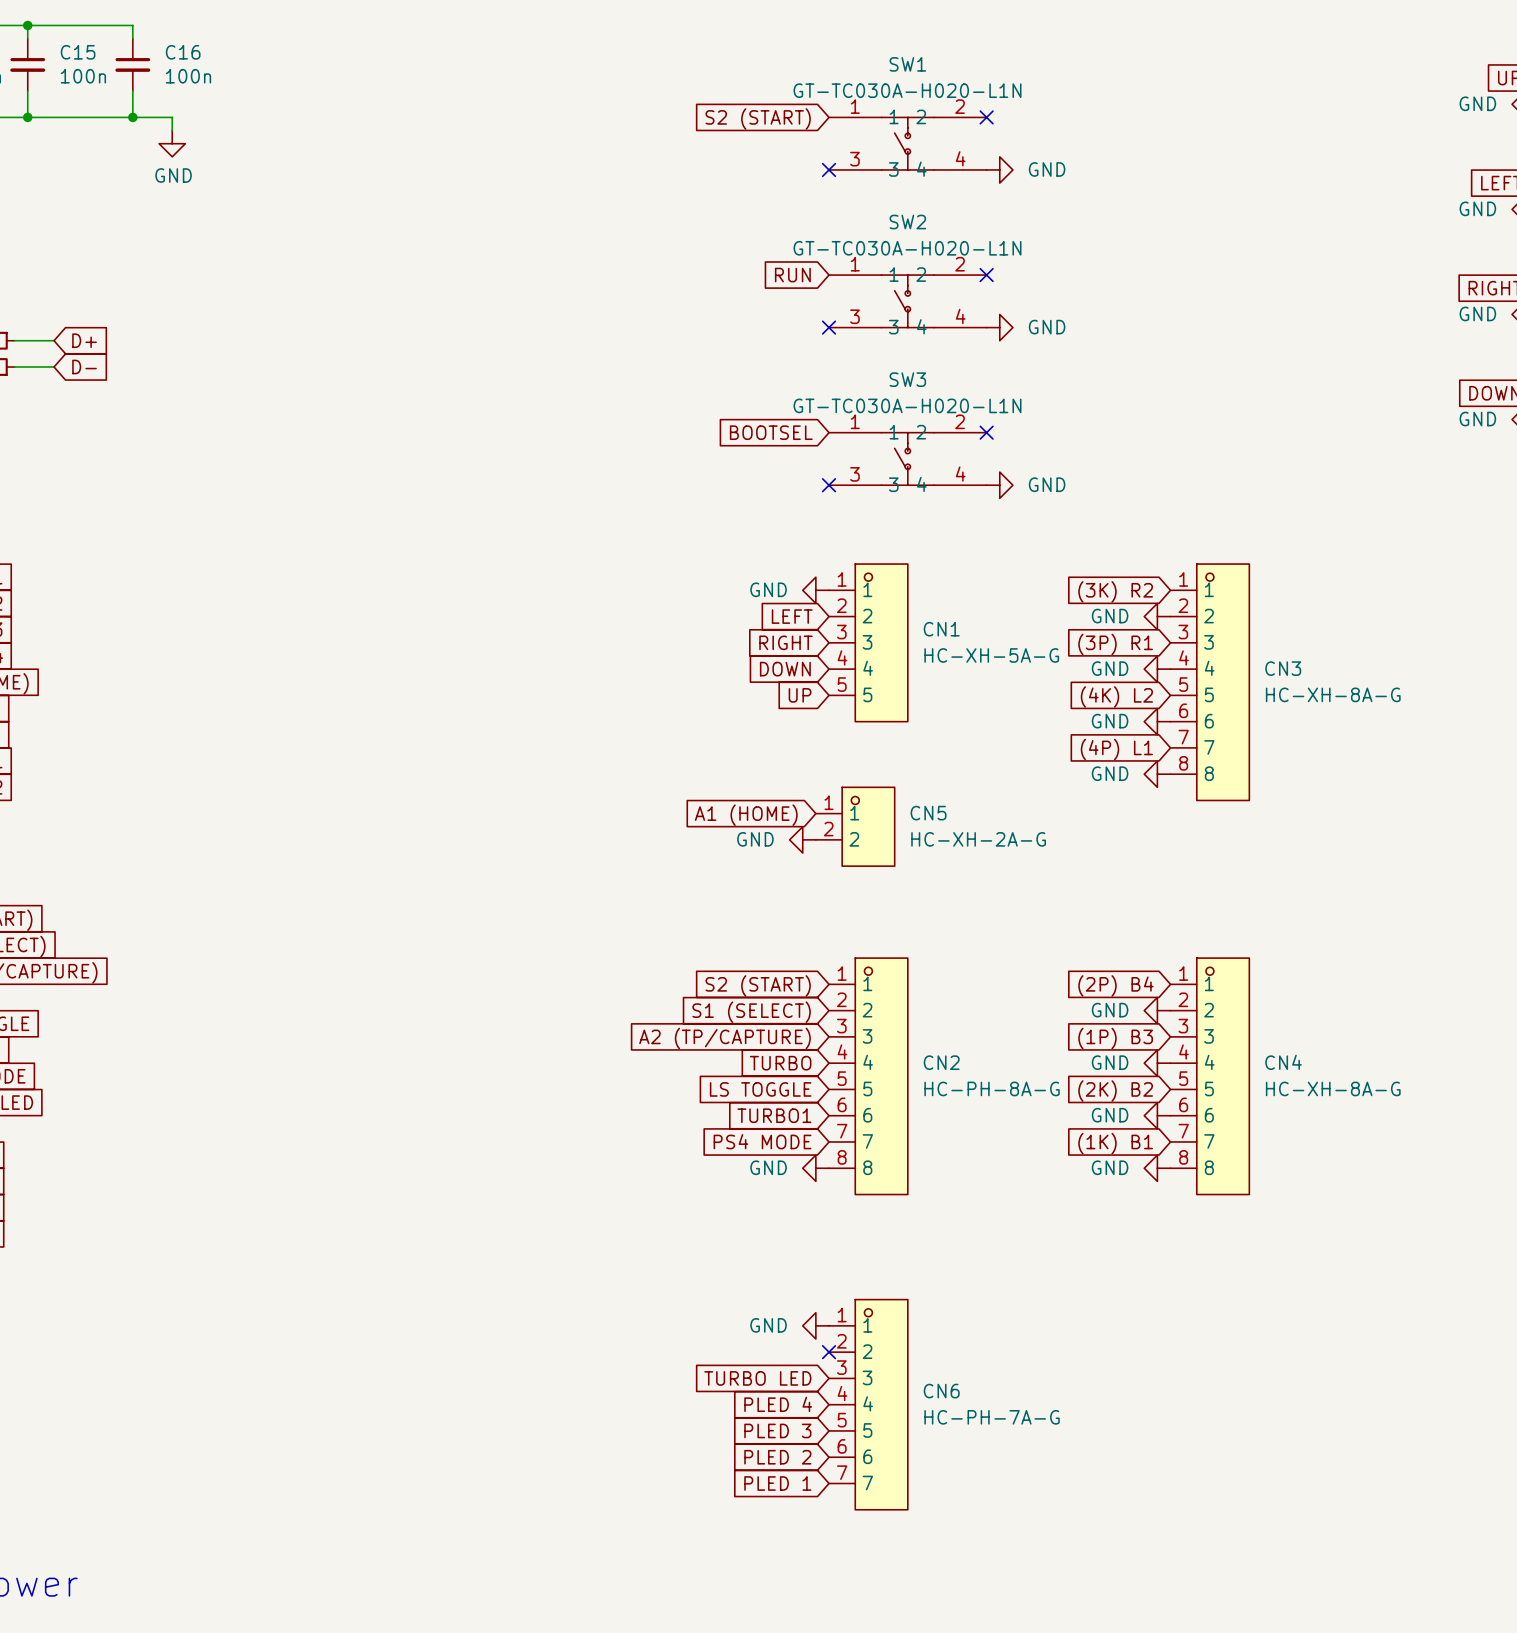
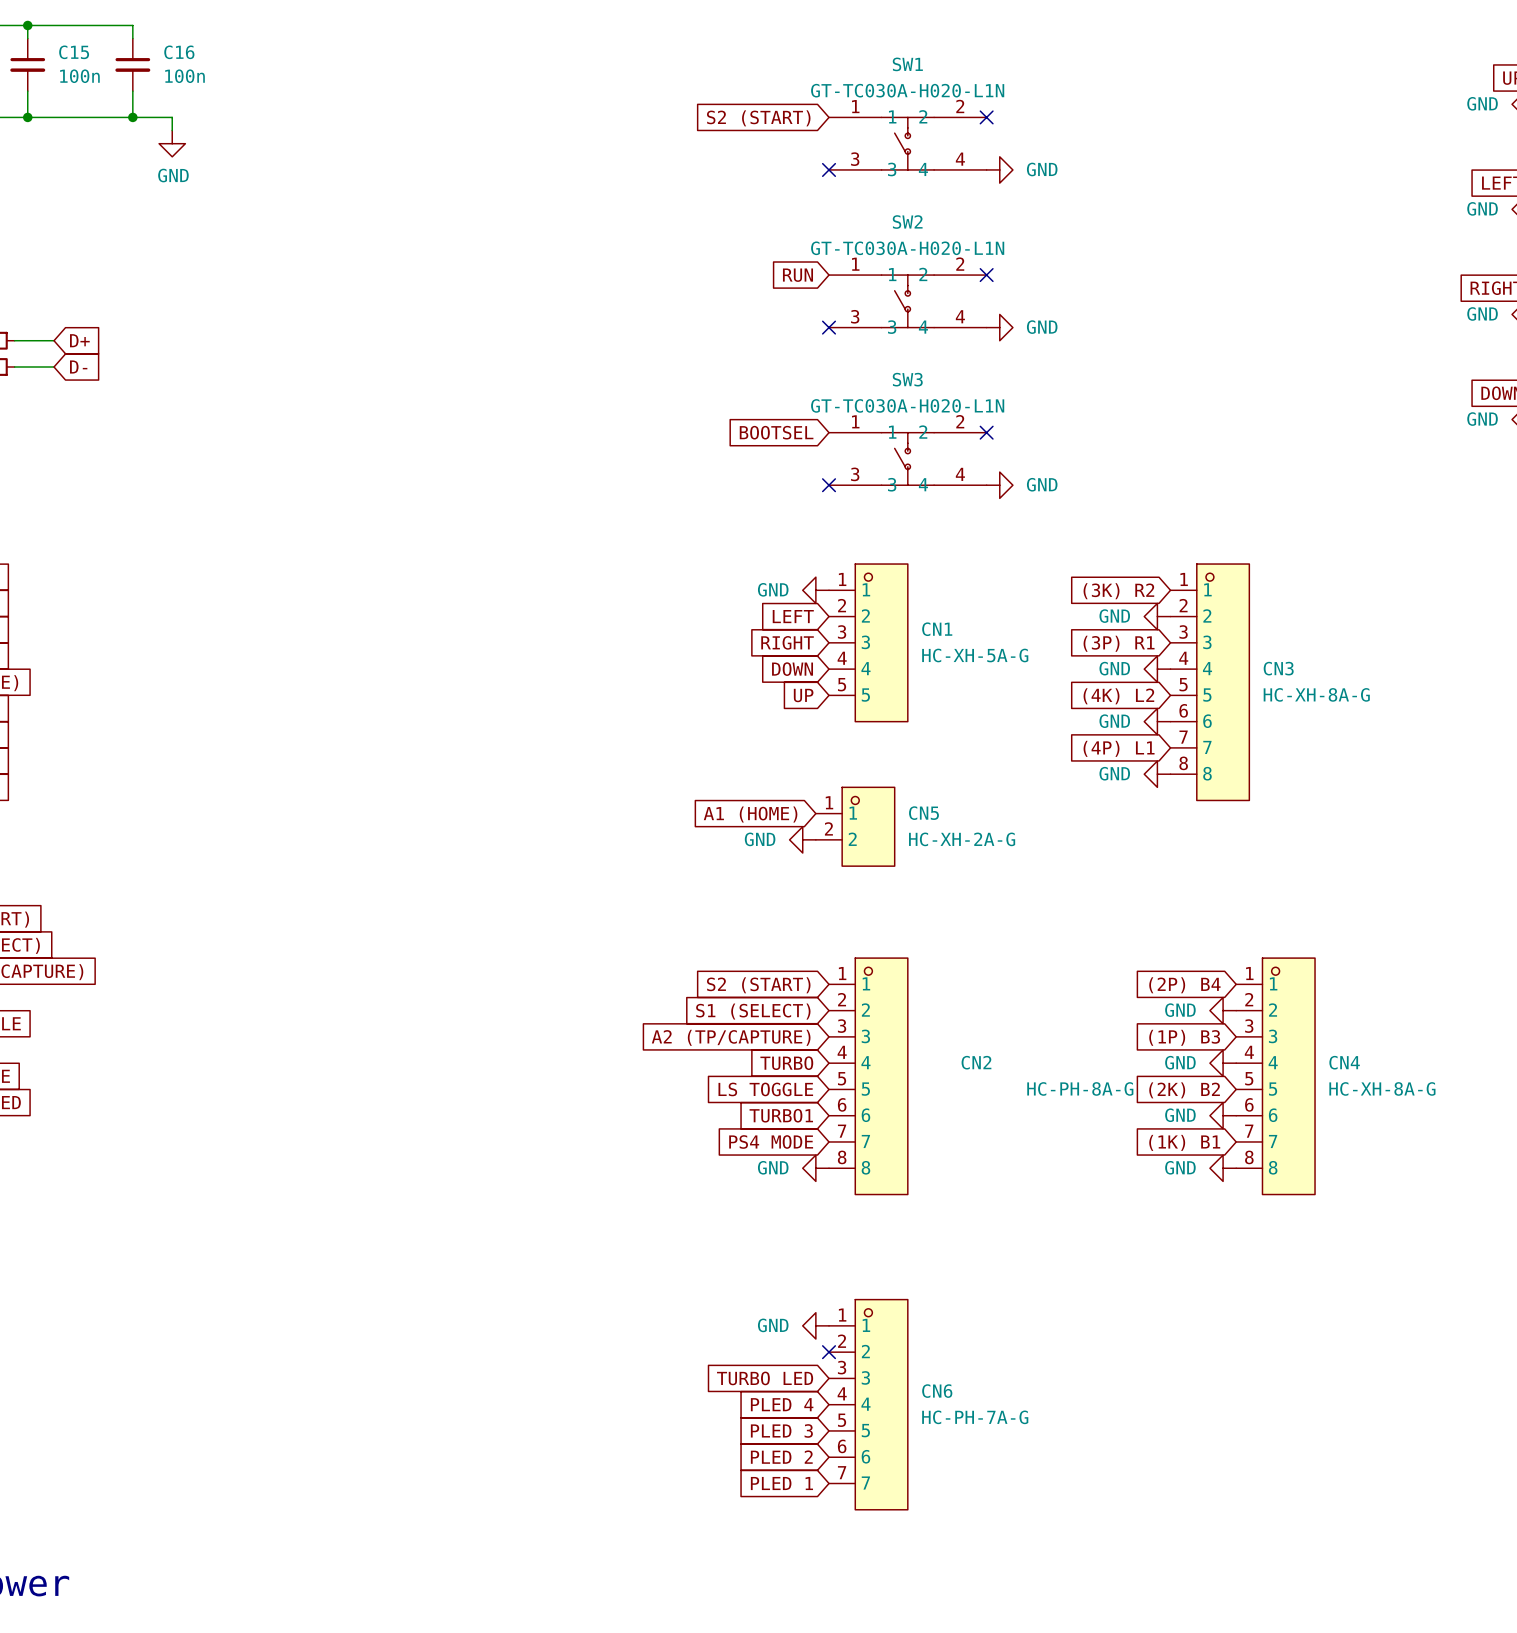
global label position: (2P) B4 (1115, 985) -> (2P) B4 (1184, 985)
power symbol: GND (1157, 1010) -> none
power symbol: none -> GND (1223, 1010)
global label position: (1P) B3 (1115, 1038) -> (1P) B3 (1184, 1037)
CN2 name position: CN2 (941, 1062) -> CN2 (976, 1062)
power symbol: GND (1157, 1063) -> none
power symbol: none -> GND (1223, 1063)
CN4 position: (1209, 1076) -> (1275, 1076)
CN2 value position: HC-PH-8A-G (992, 1088) -> HC-PH-8A-G (1080, 1088)
global label position: (2K) B2 (1115, 1091) -> (2K) B2 (1184, 1090)
power symbol: GND (1157, 1115) -> none
power symbol: none -> GND (1223, 1115)
global label position: (1K) B1 (1115, 1143) -> (1K) B1 (1184, 1142)
power symbol: GND (1157, 1168) -> none
power symbol: none -> GND (1223, 1168)

